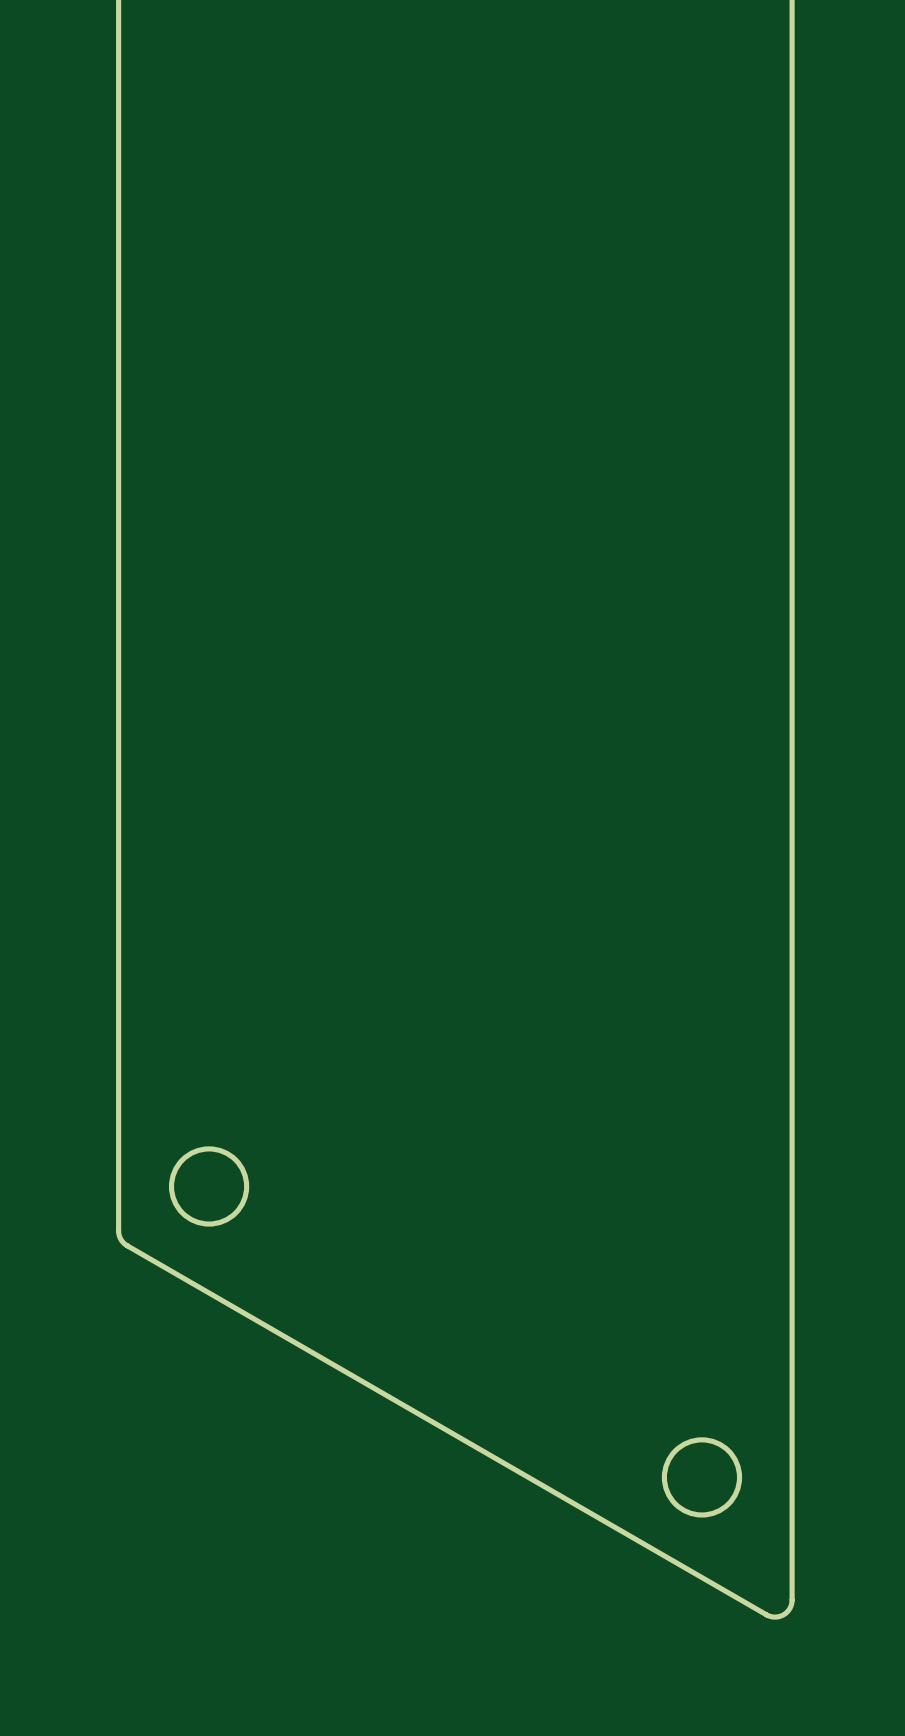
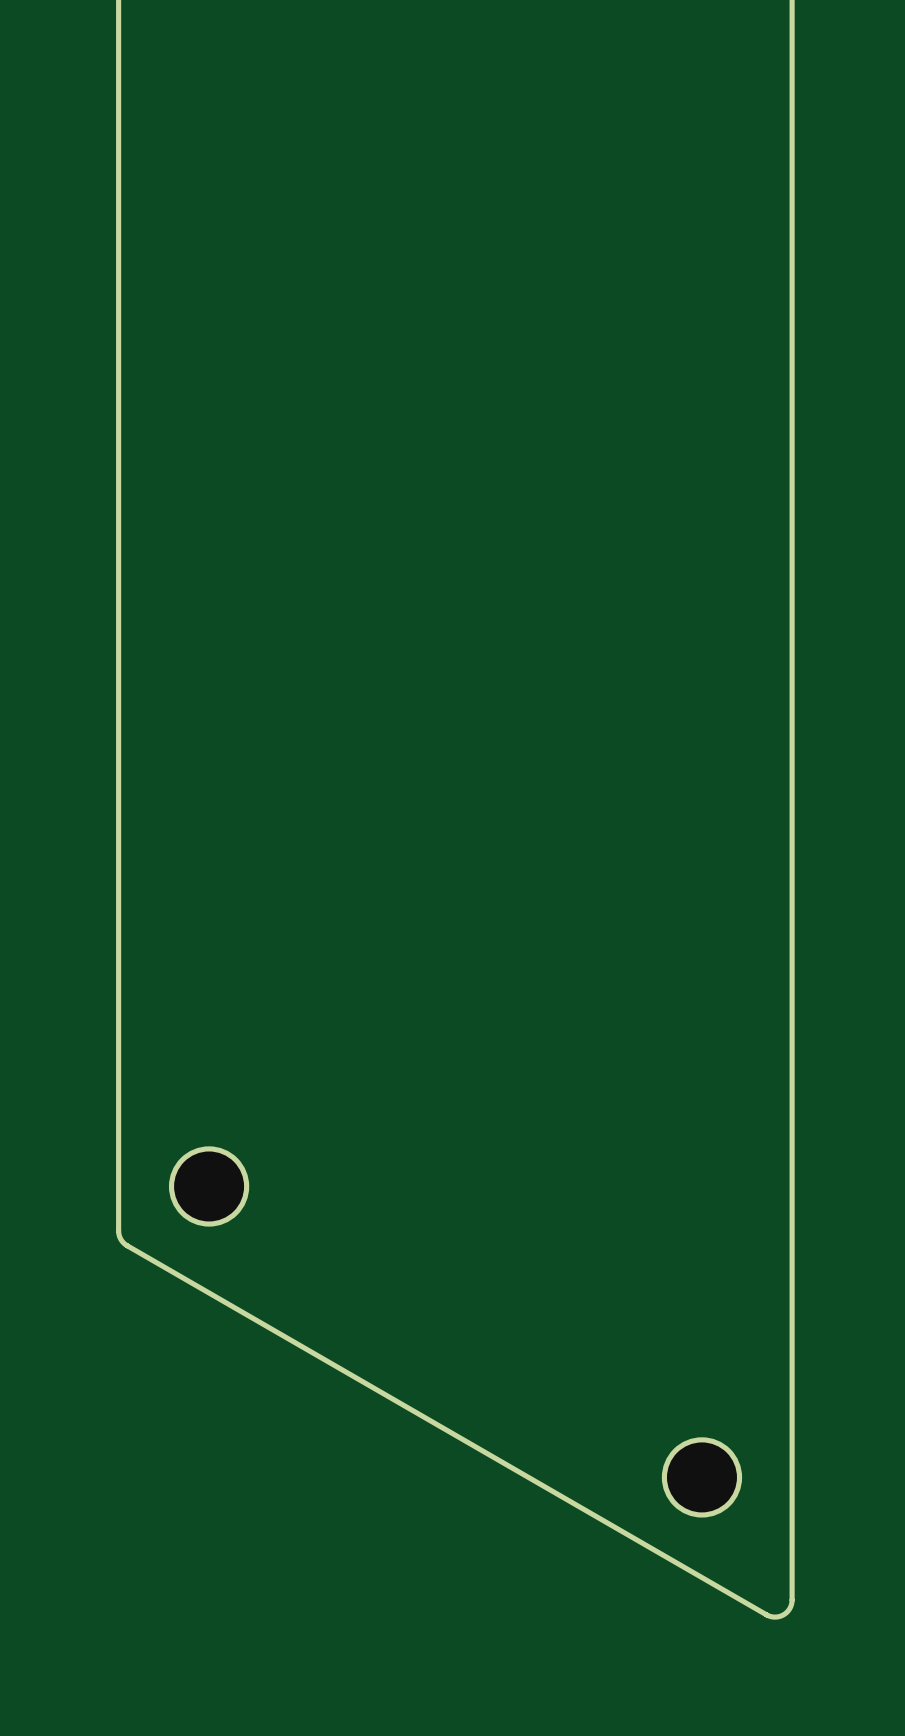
part: none -> (209, 1186)
part: none -> (701, 1477)

